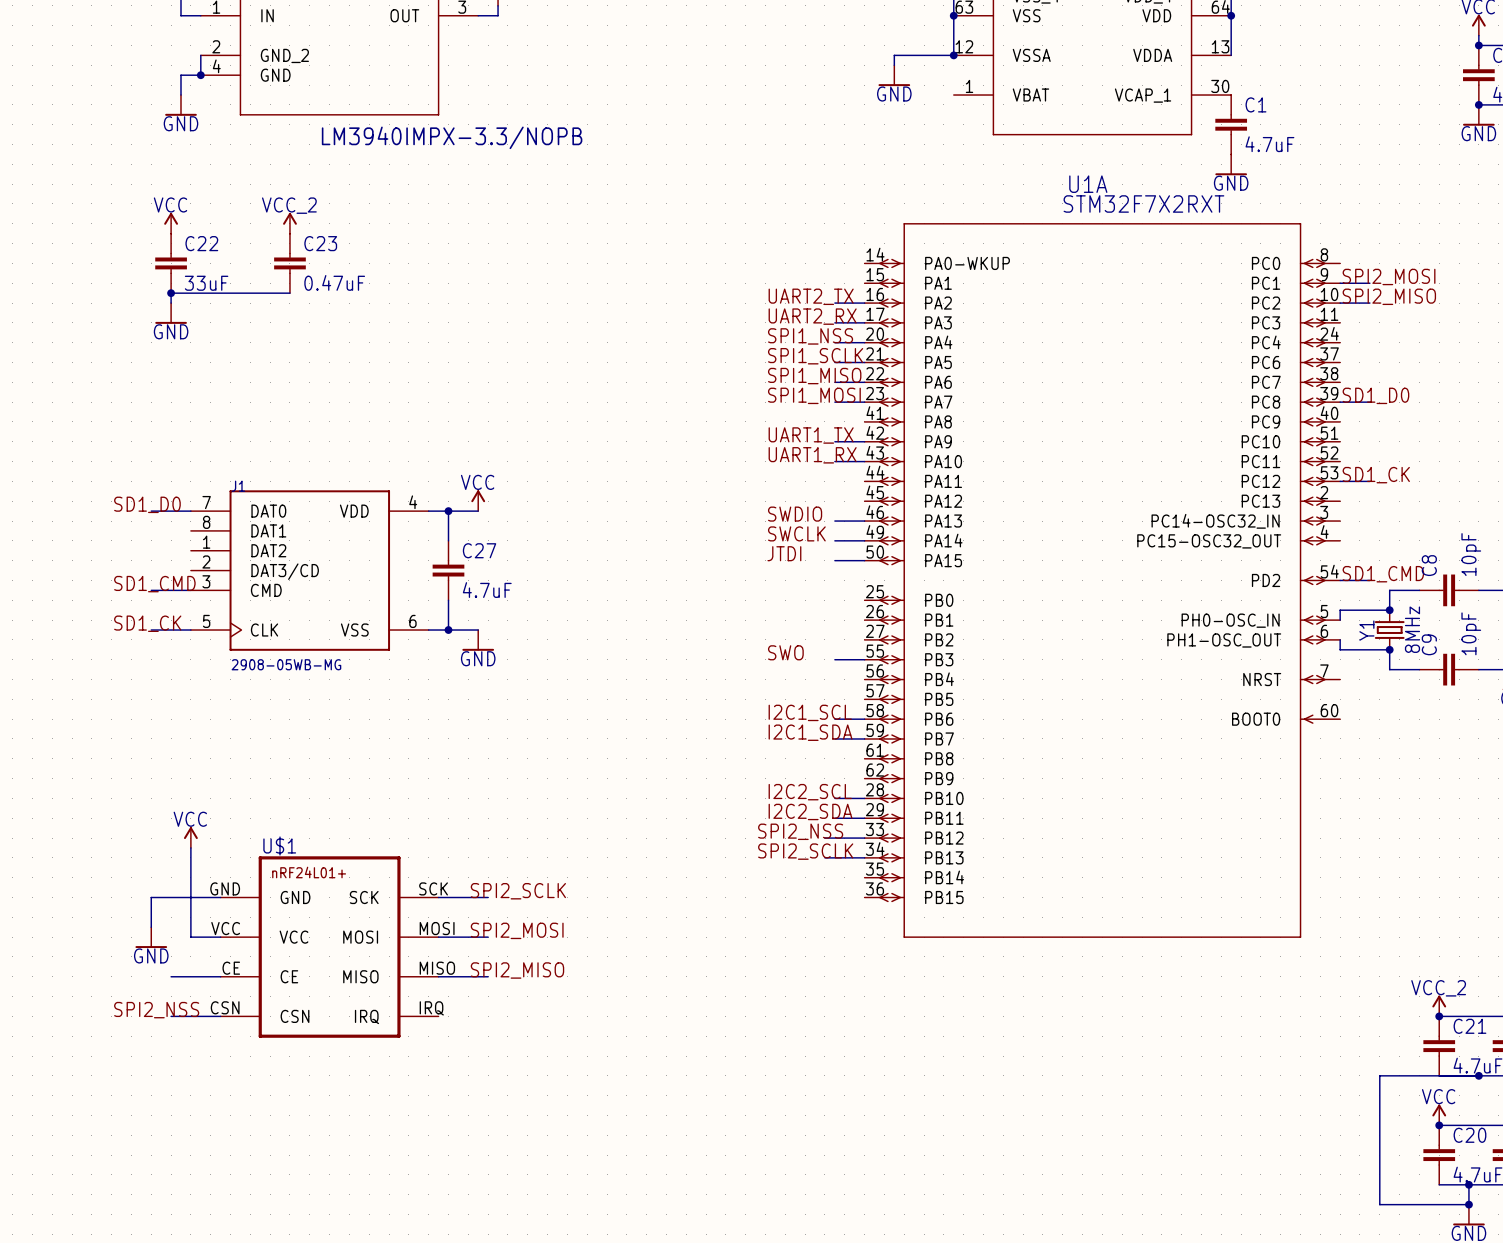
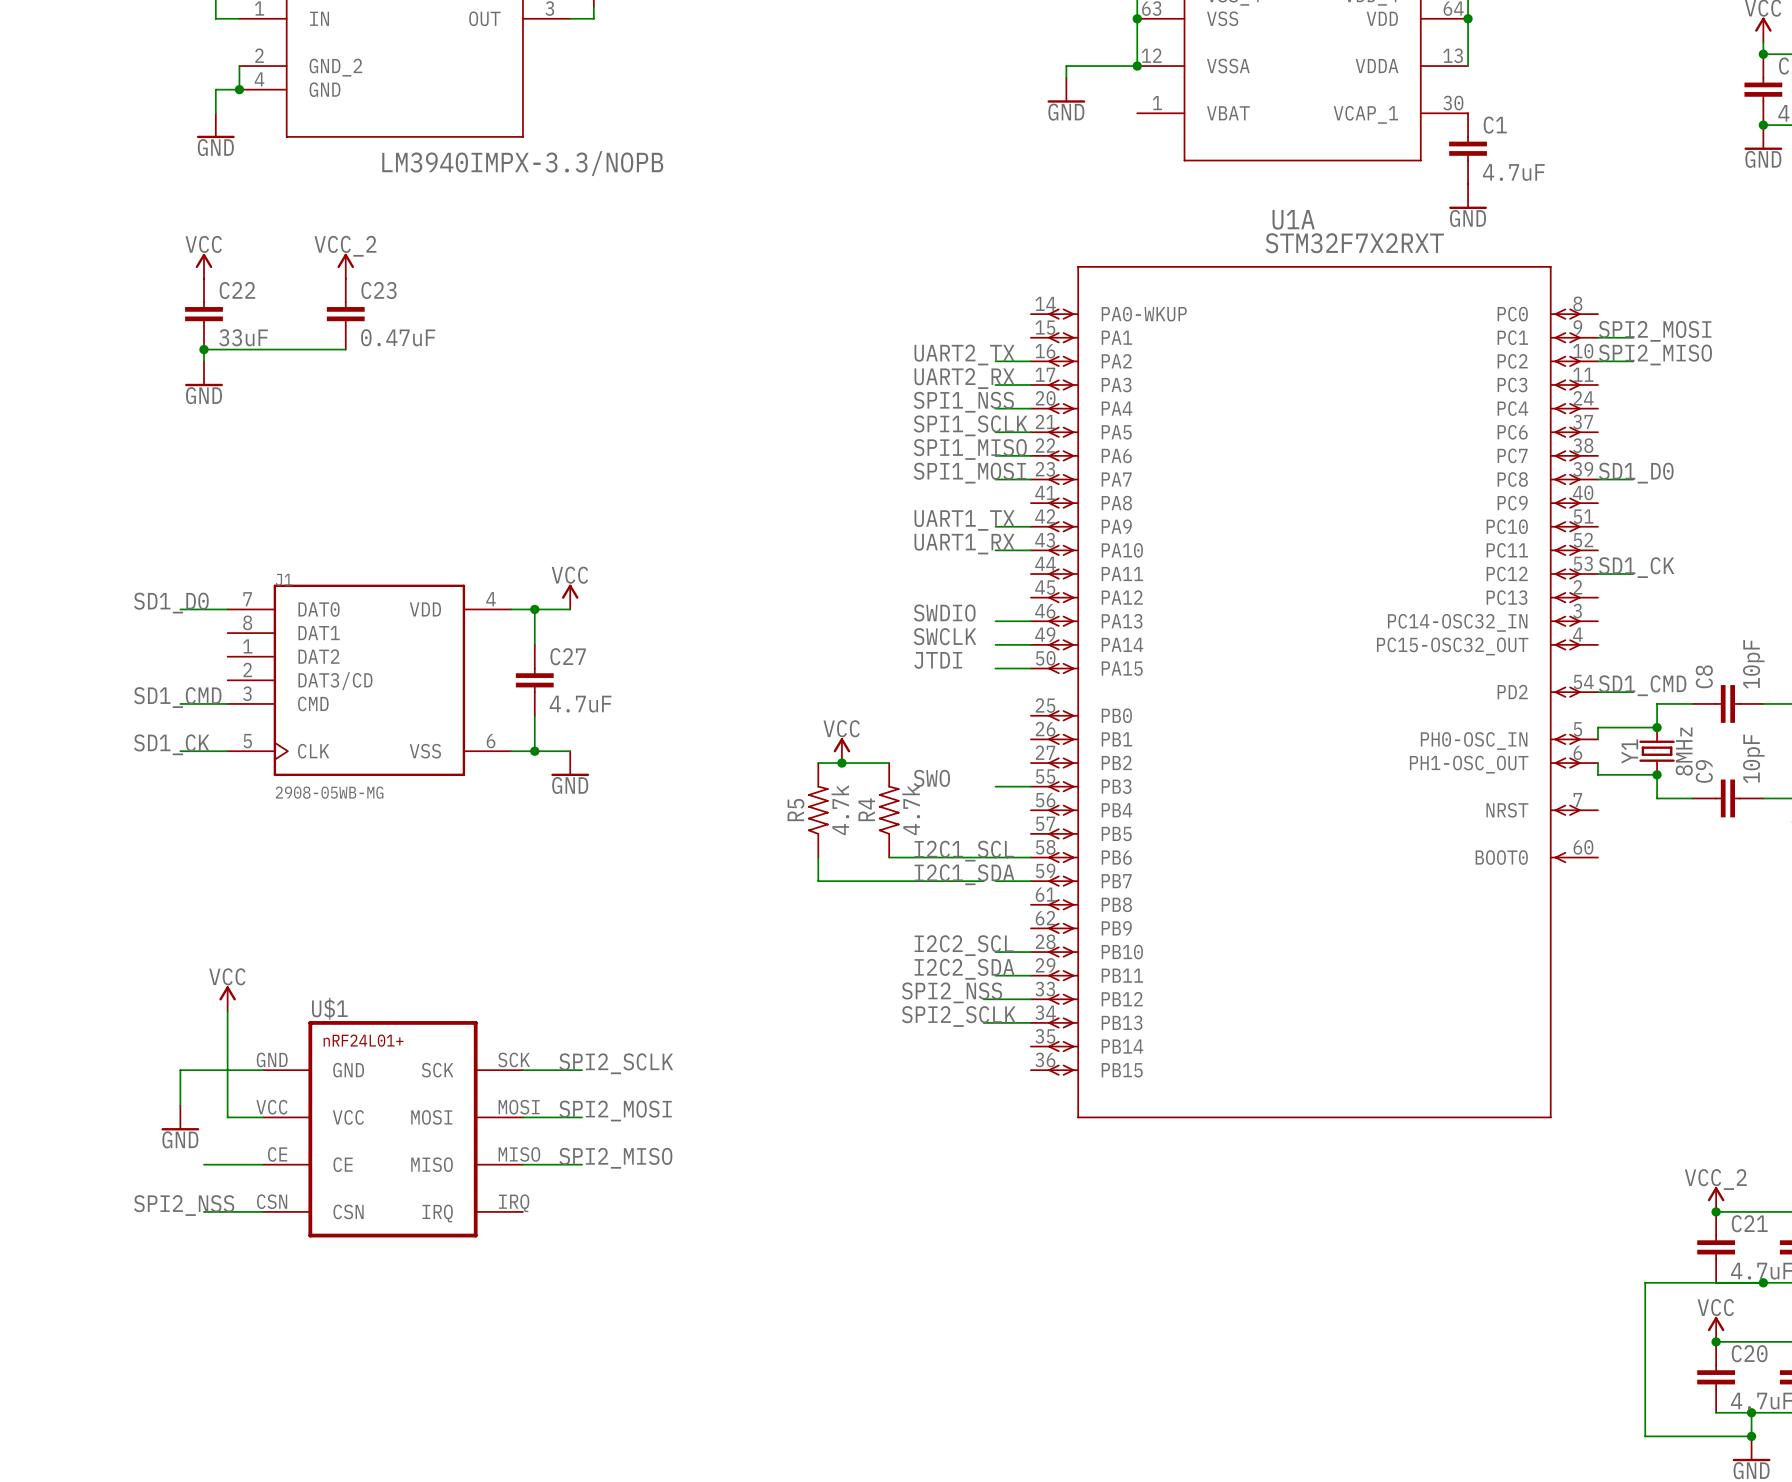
power symbol: none -> VCC (841, 750)
wire: none -> (818, 763) (889, 763)
junction: none -> (841, 763)
R5: none -> 4.7k (818, 810)
R4: none -> 4.7k (889, 810)
wire: none -> (818, 857) (818, 881) (983, 881)
wire: none -> (889, 857) (995, 857)

